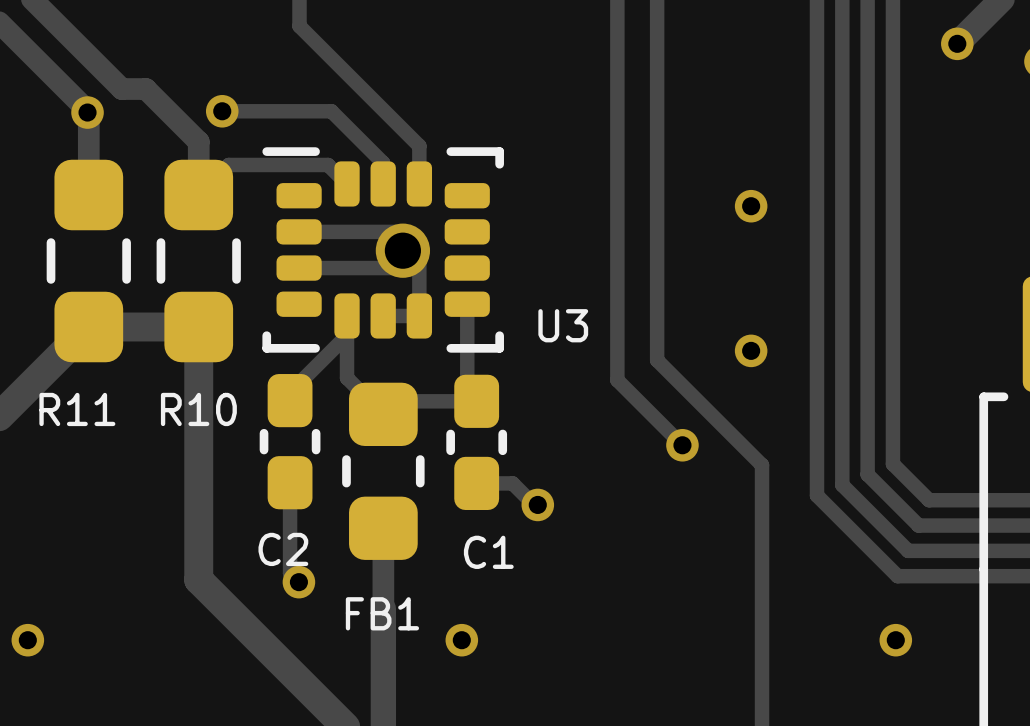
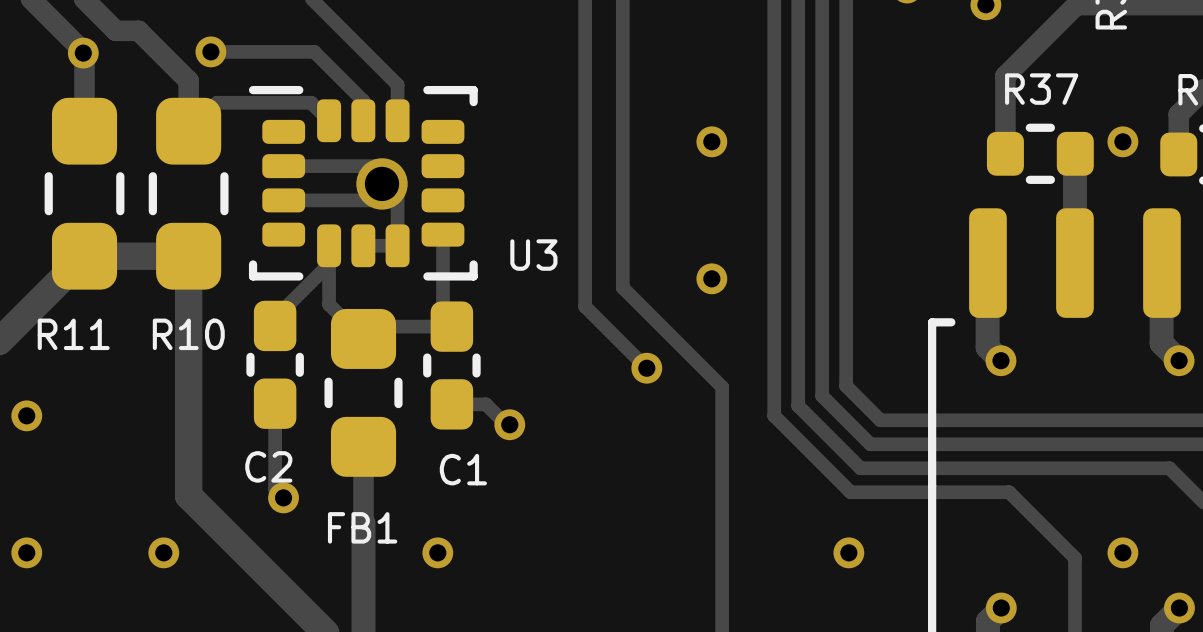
via: none -> (26, 415)
via: none -> (163, 552)

